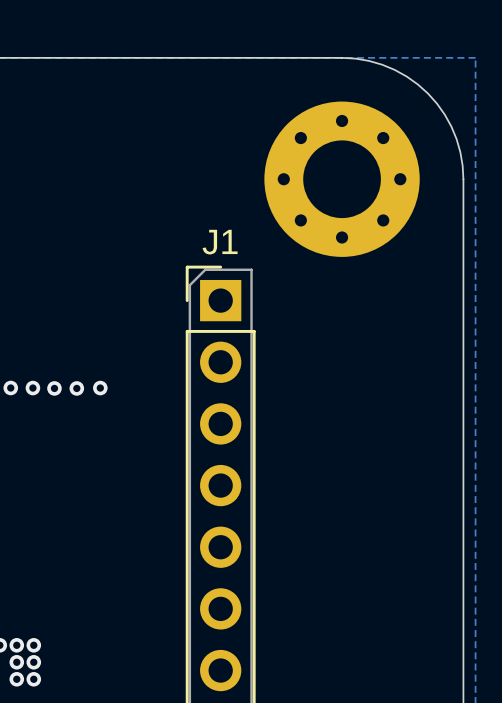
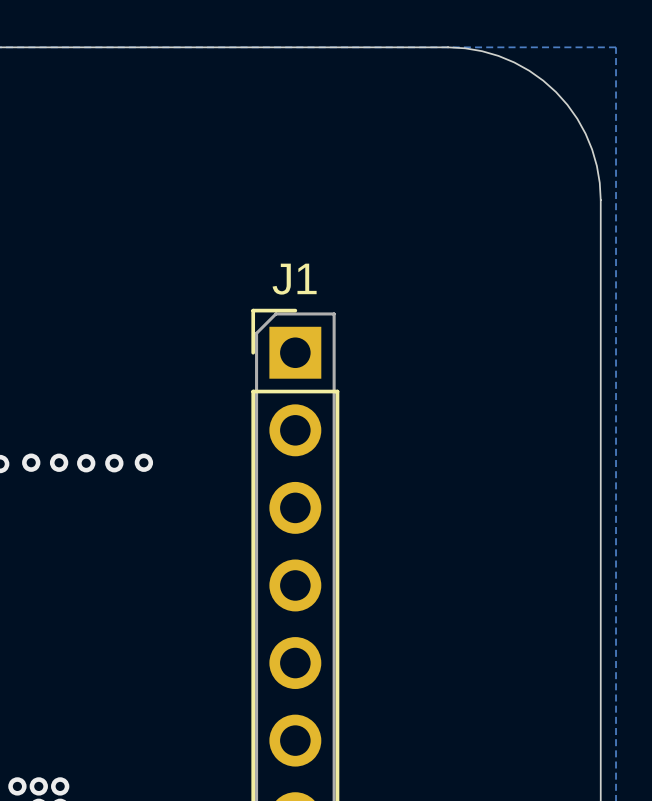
part: (342, 179) -> none

